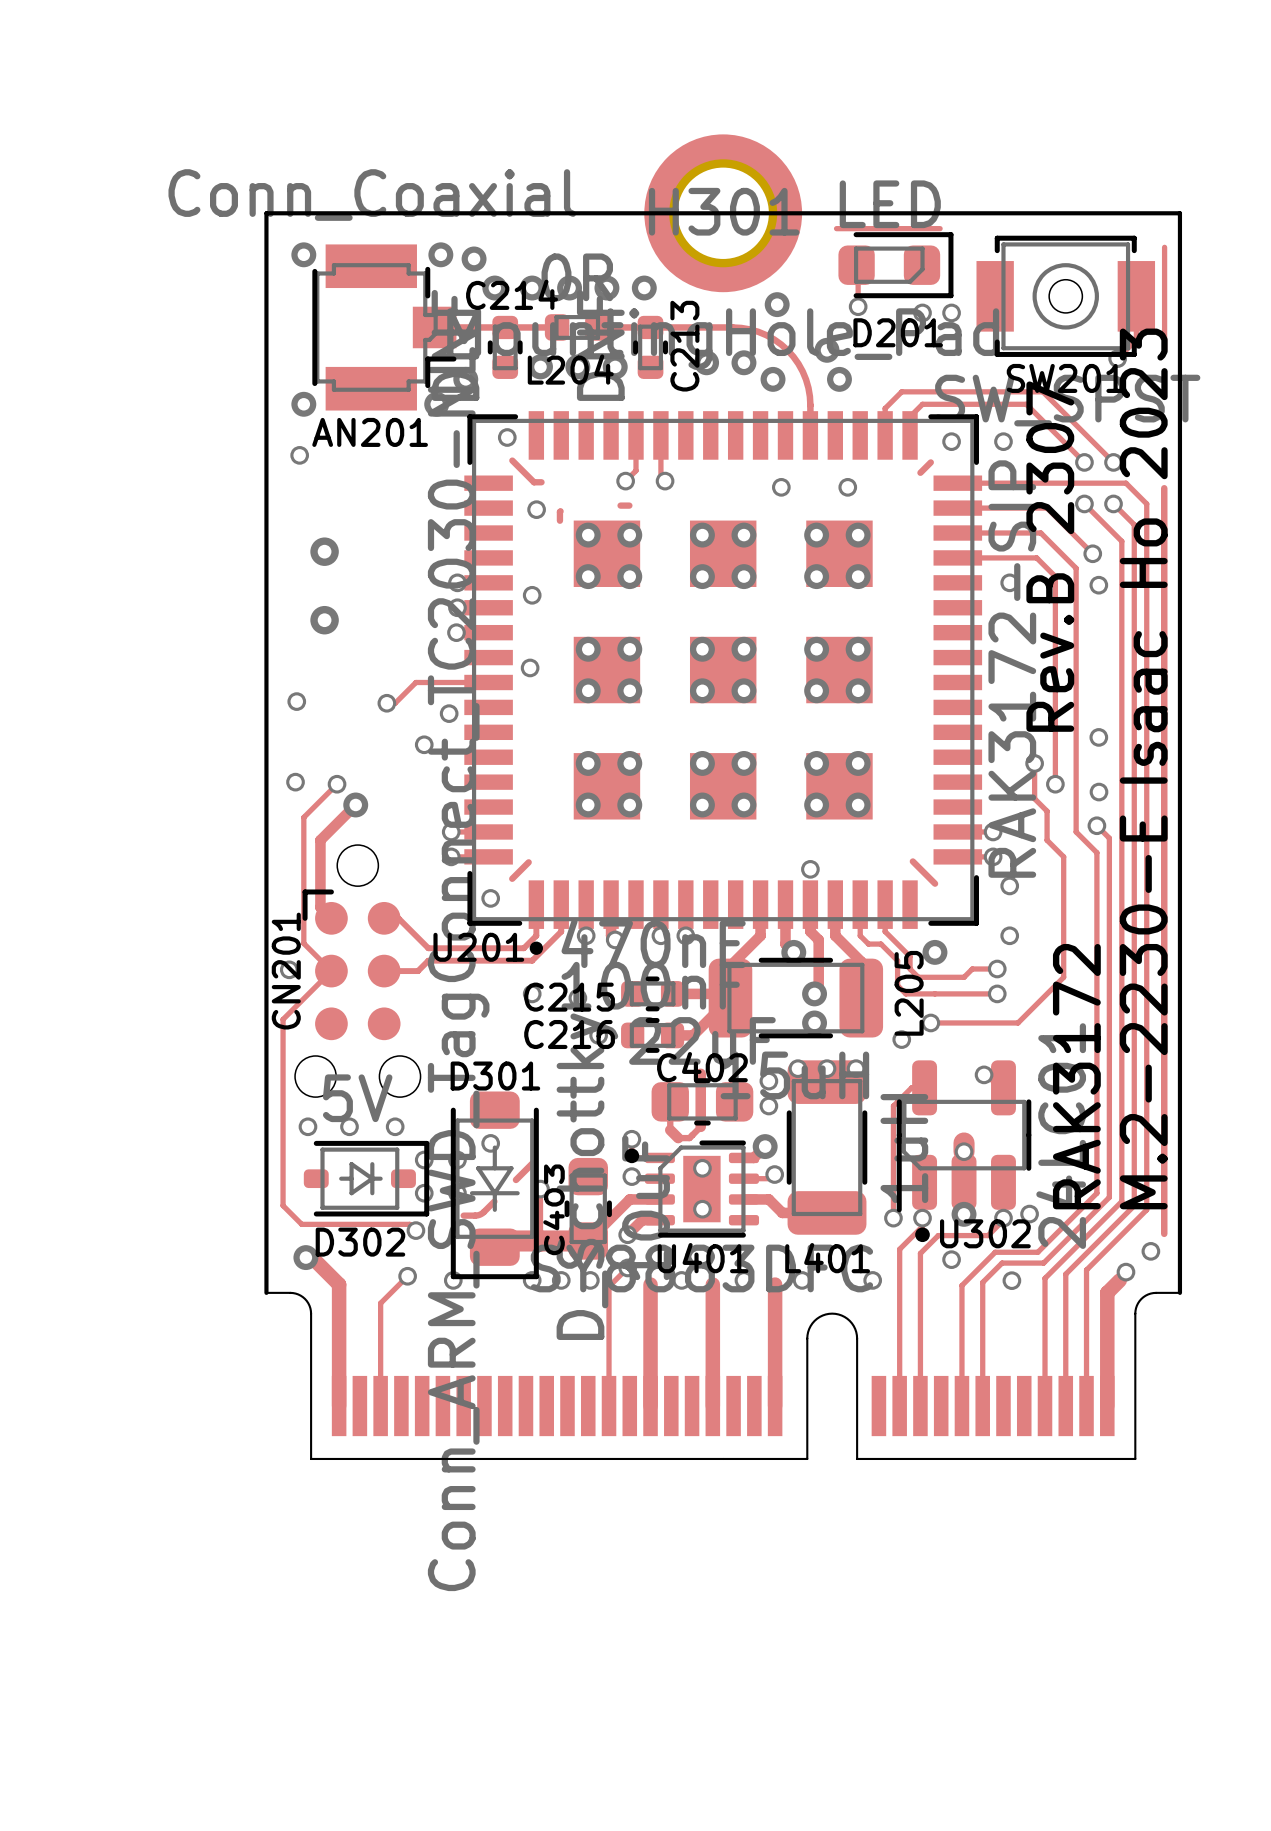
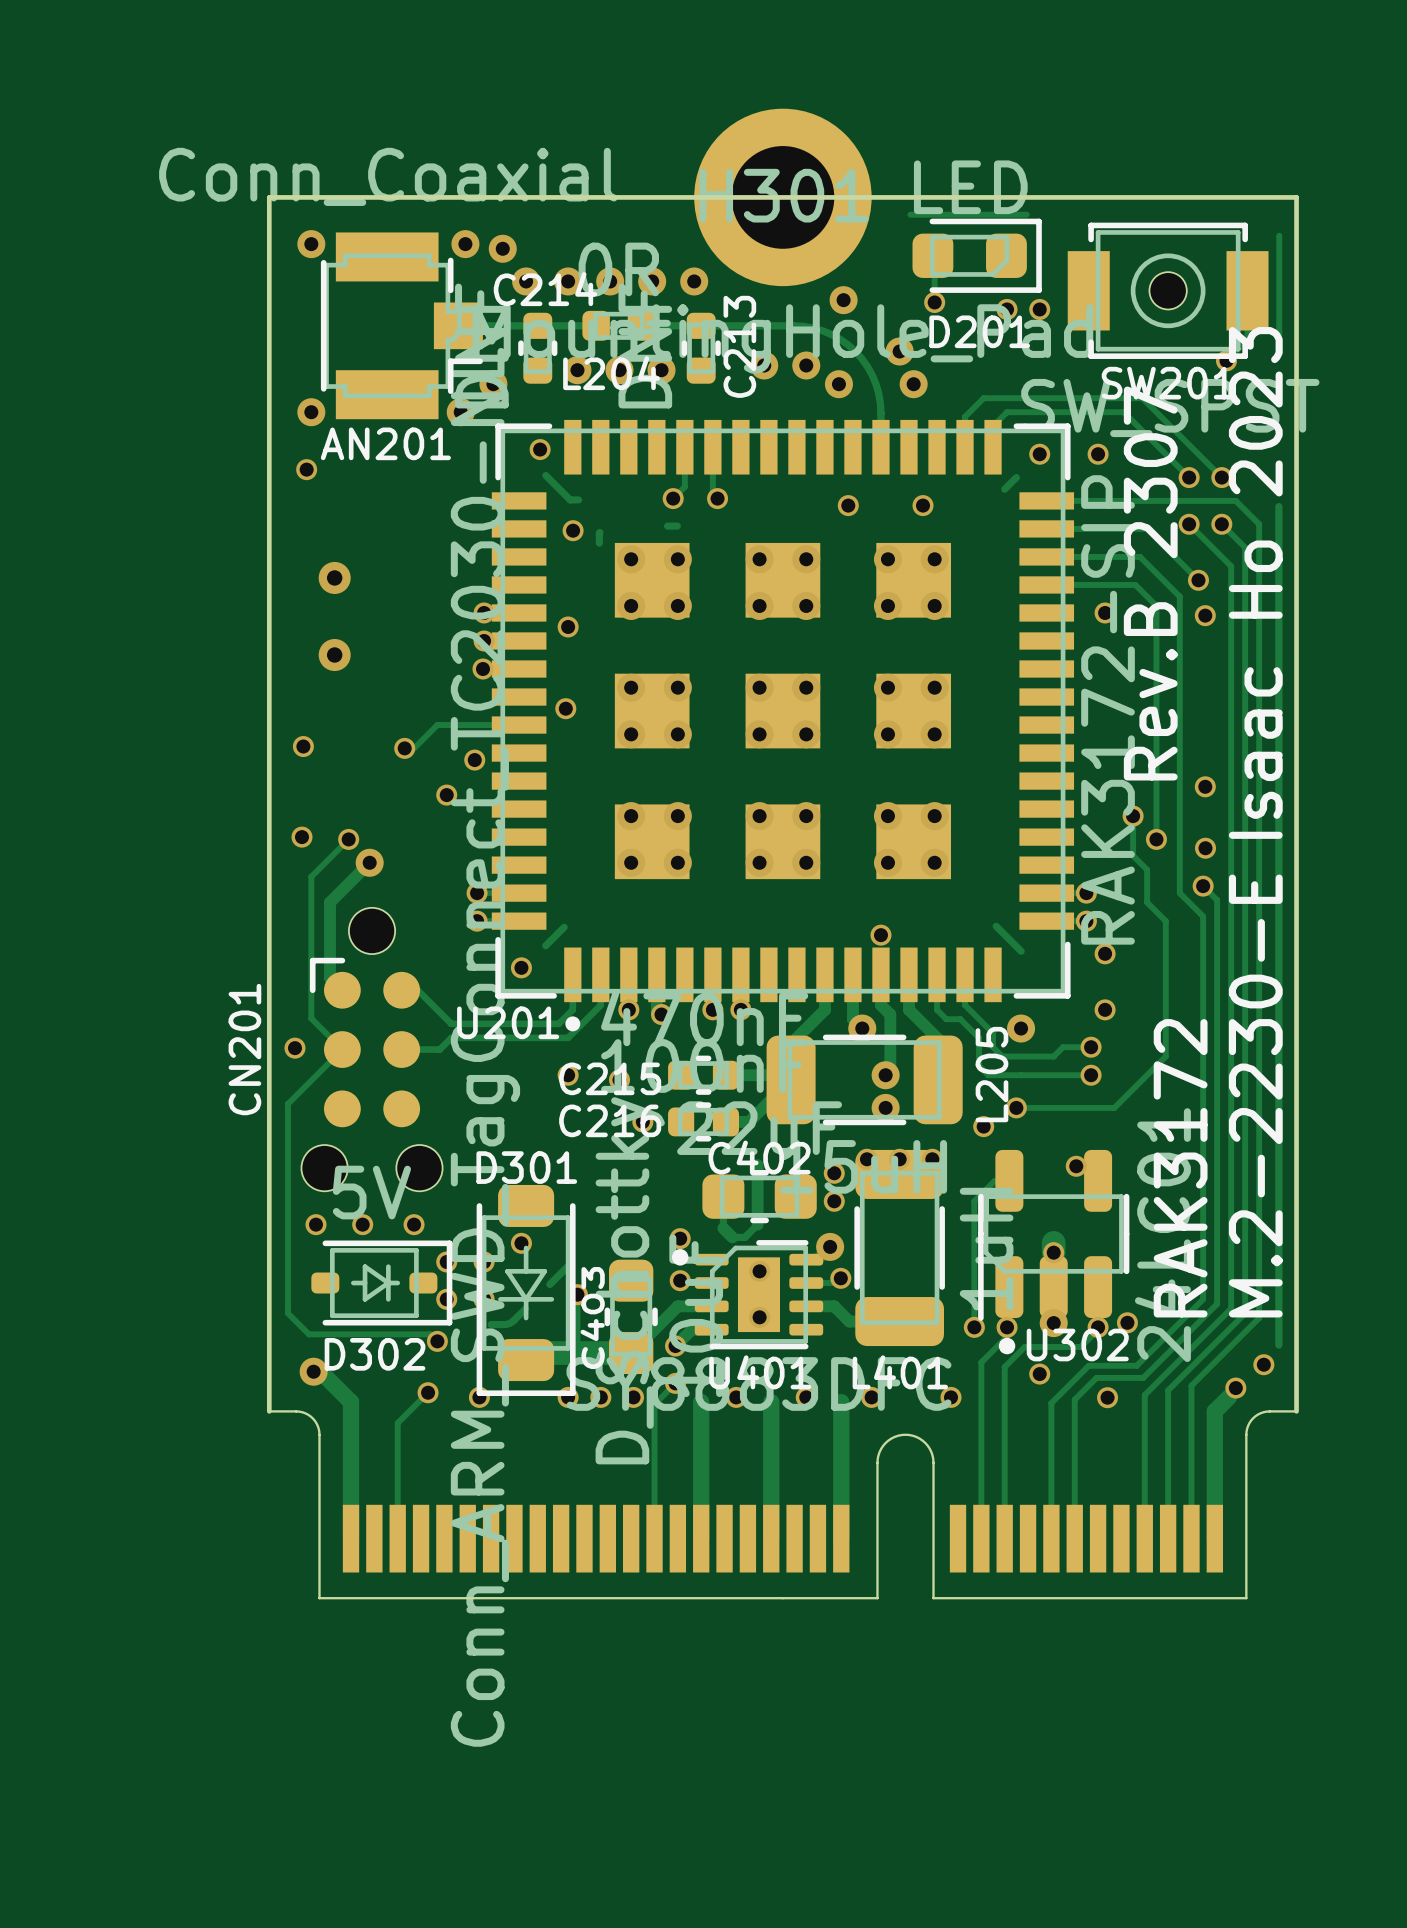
CN201 name position: CN201 (286, 971) -> CN201 (244, 1049)

